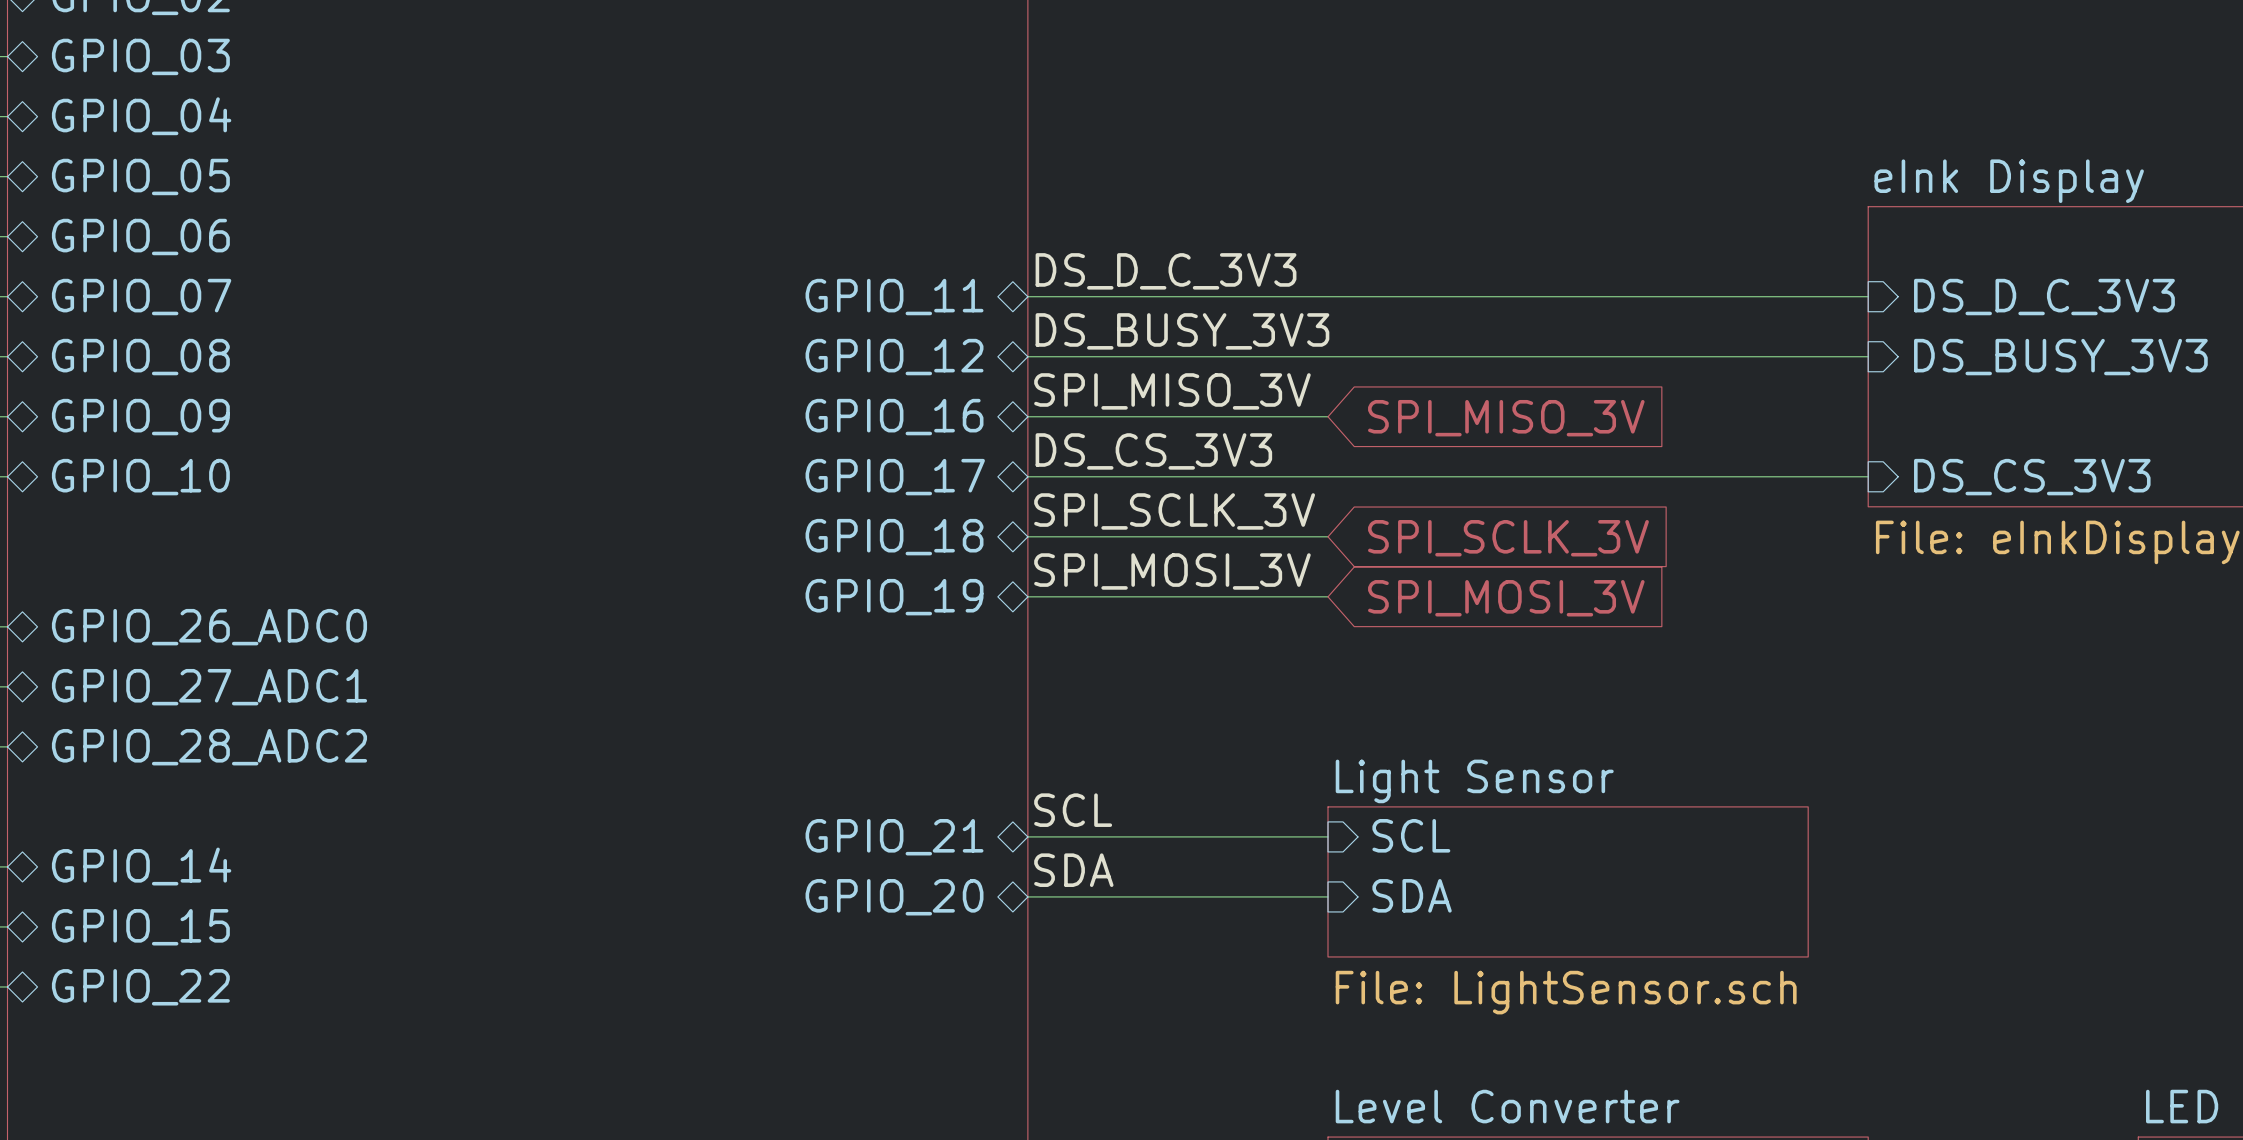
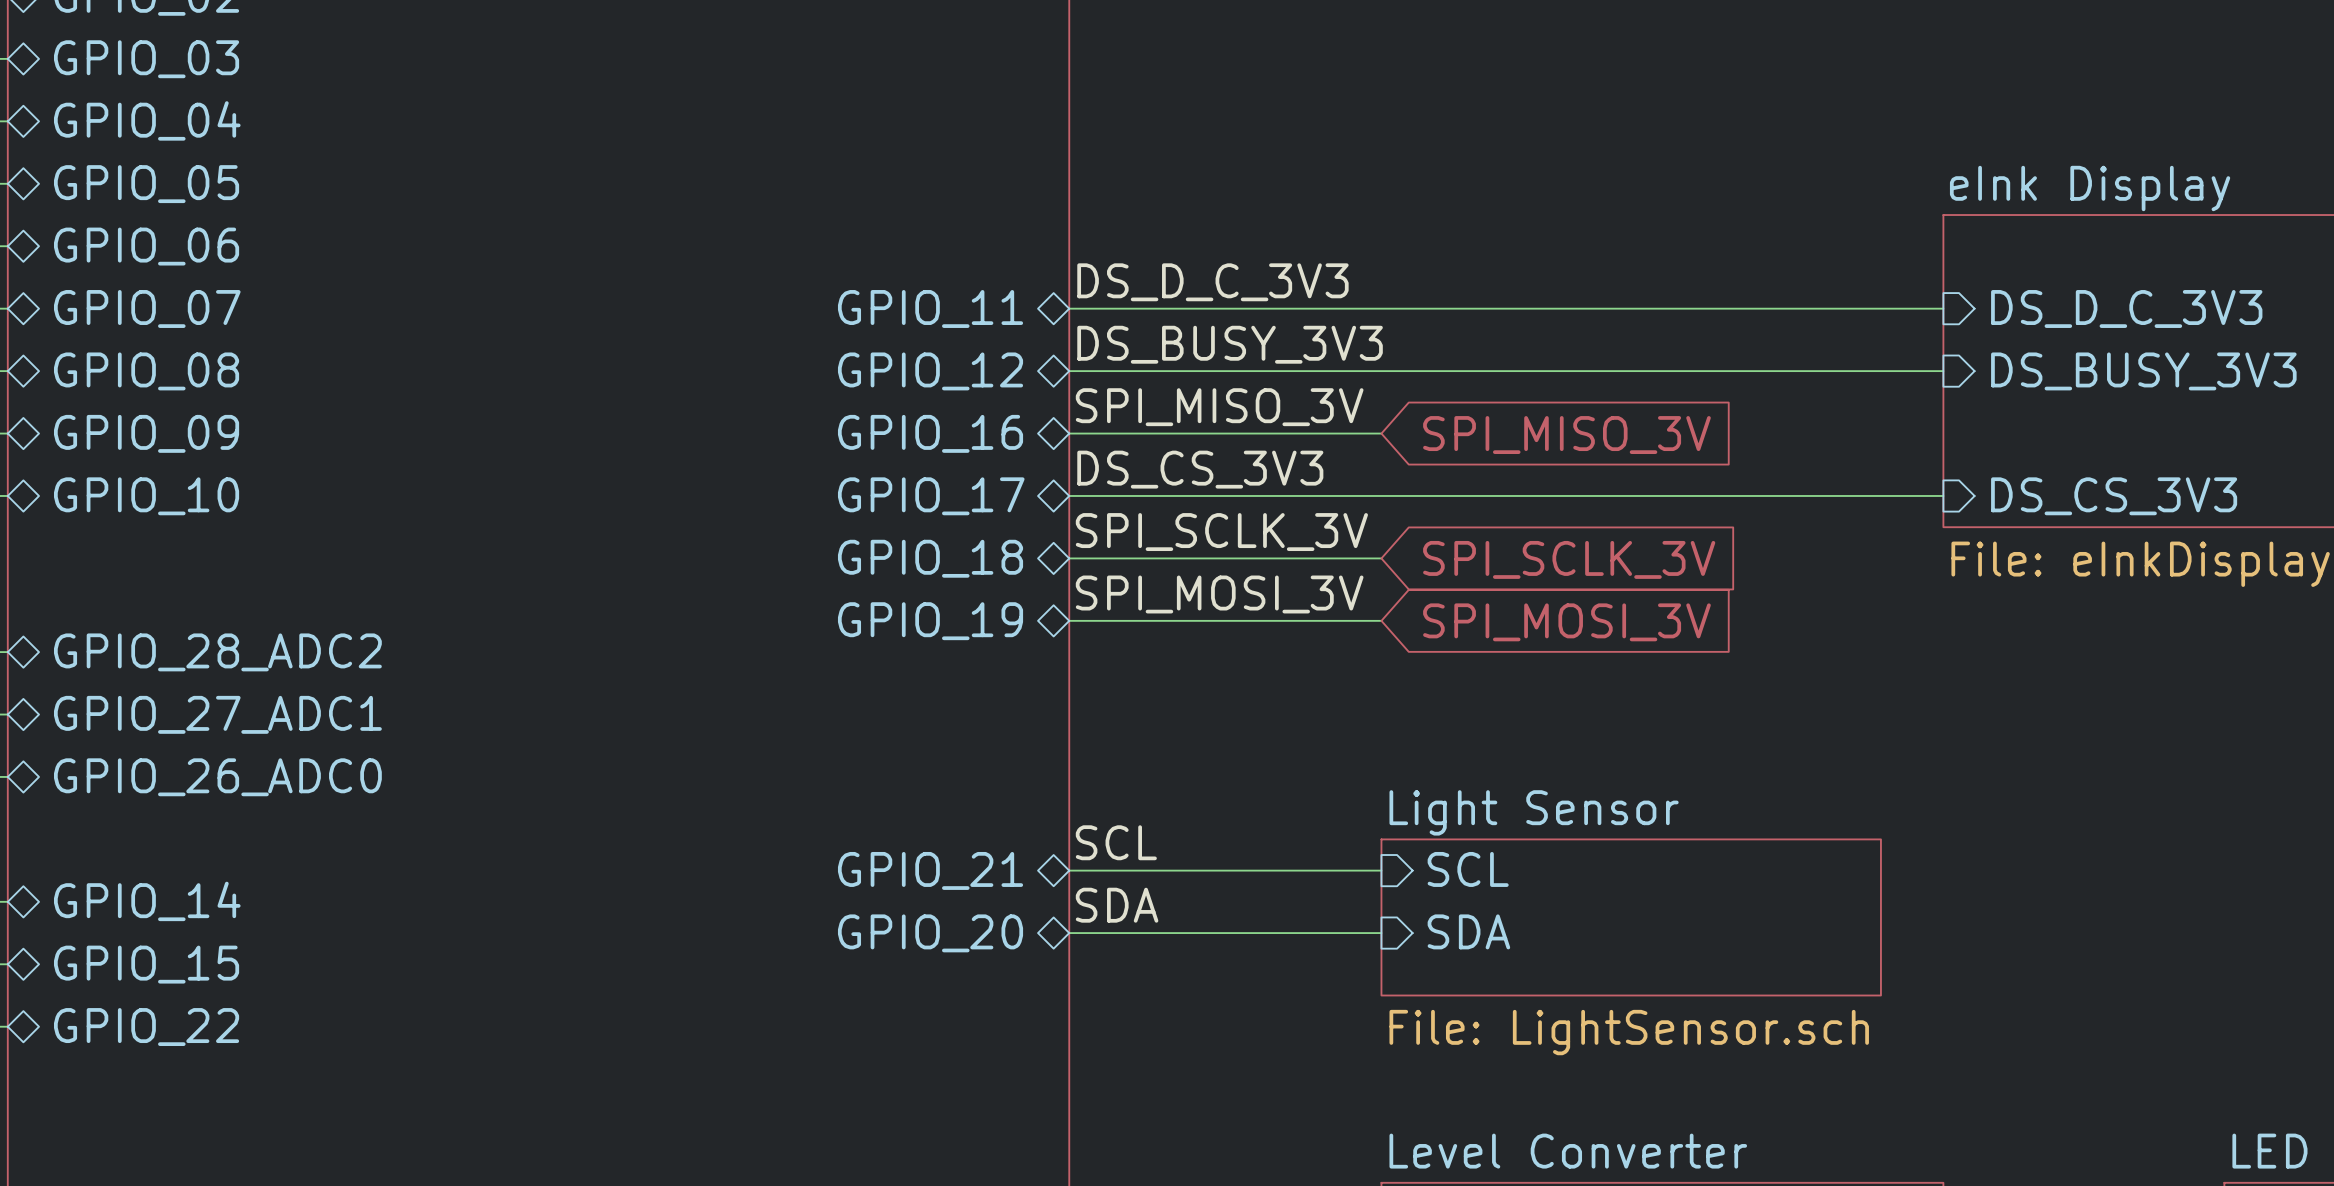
sheet pin: GPIO_26_ADC0 (209, 627) -> GPIO_28_ADC2 (217, 652)
sheet pin: GPIO_28_ADC2 (209, 747) -> GPIO_26_ADC0 (217, 777)

